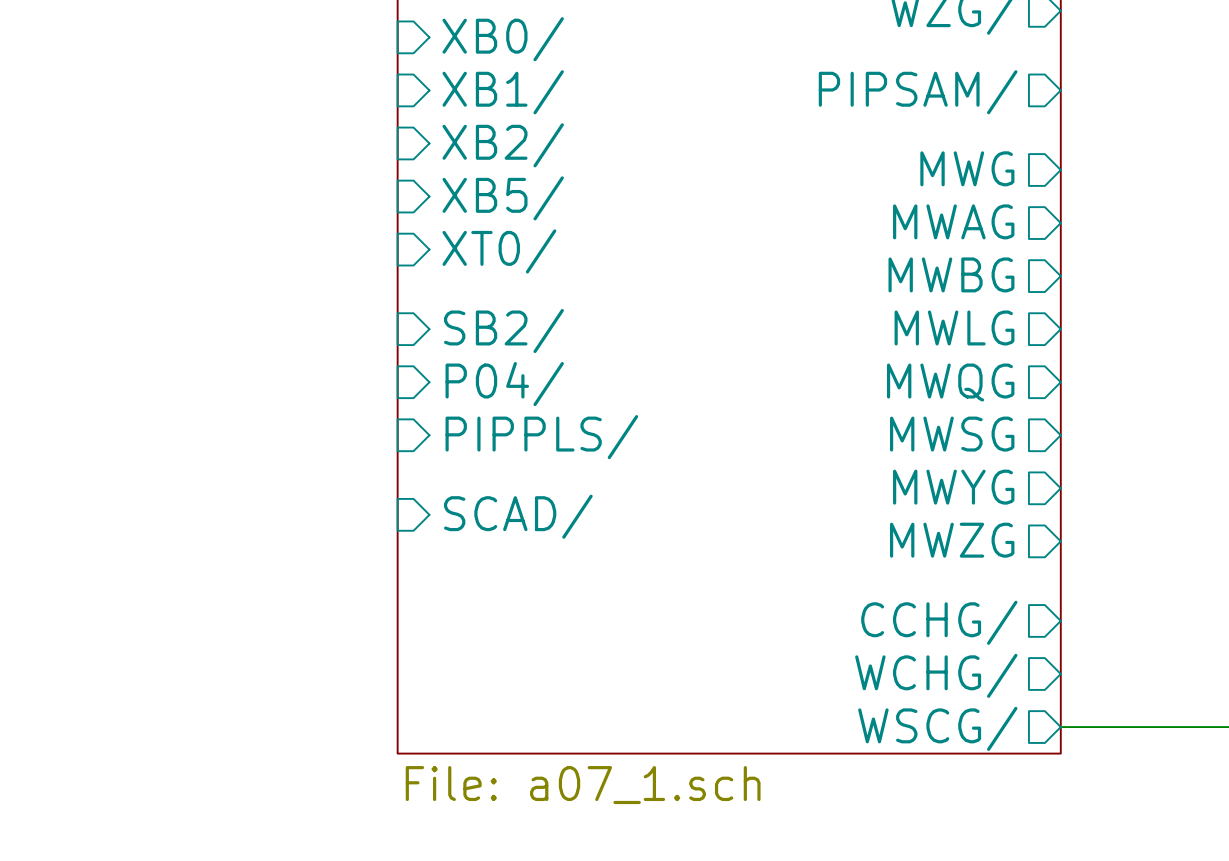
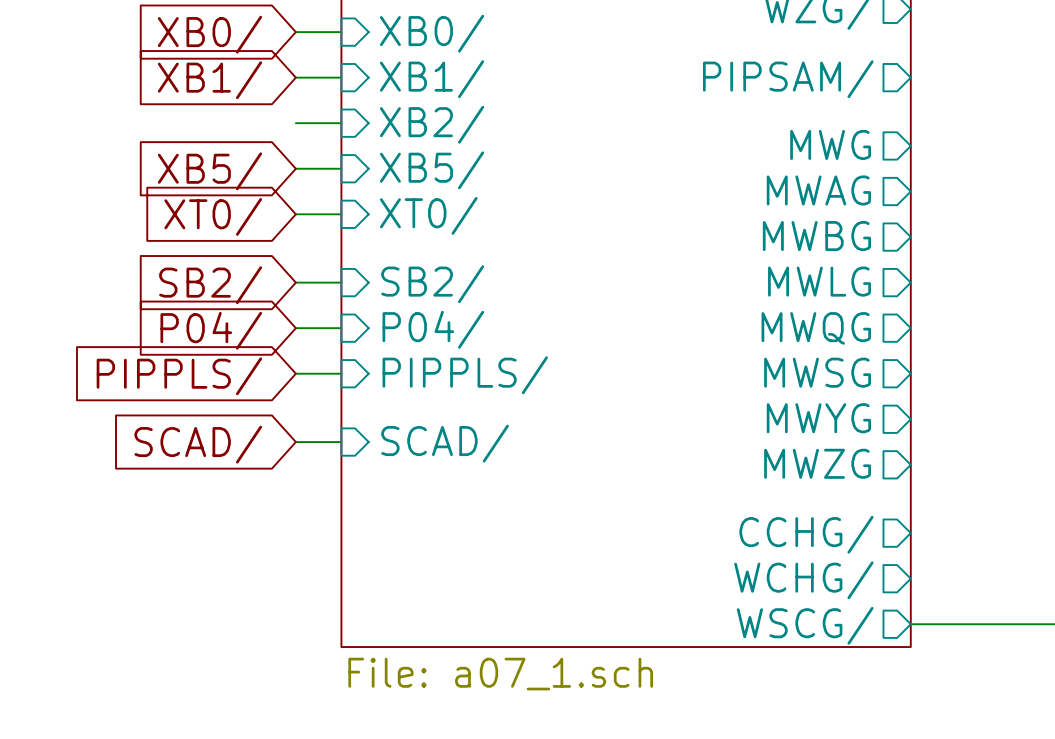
wire: none -> (295, 32) (341, 32)
global label: none -> XB0/ (209, 34)
wire: none -> (295, 77) (341, 77)
global label: none -> XB1/ (209, 80)
wire: none -> (295, 123) (341, 123)
wire: none -> (295, 168) (341, 168)
global label: none -> XB5/ (209, 171)
wire: none -> (295, 214) (341, 214)
global label: none -> XT0/ (213, 216)
wire: none -> (295, 282) (341, 282)
global label: none -> SB2/ (210, 285)
wire: none -> (295, 328) (341, 328)
global label: none -> P04/ (211, 330)
wire: none -> (295, 373) (341, 373)
global label: none -> PIPPLS/ (179, 376)
wire: none -> (295, 442) (341, 442)
global label: none -> SCAD/ (198, 444)

